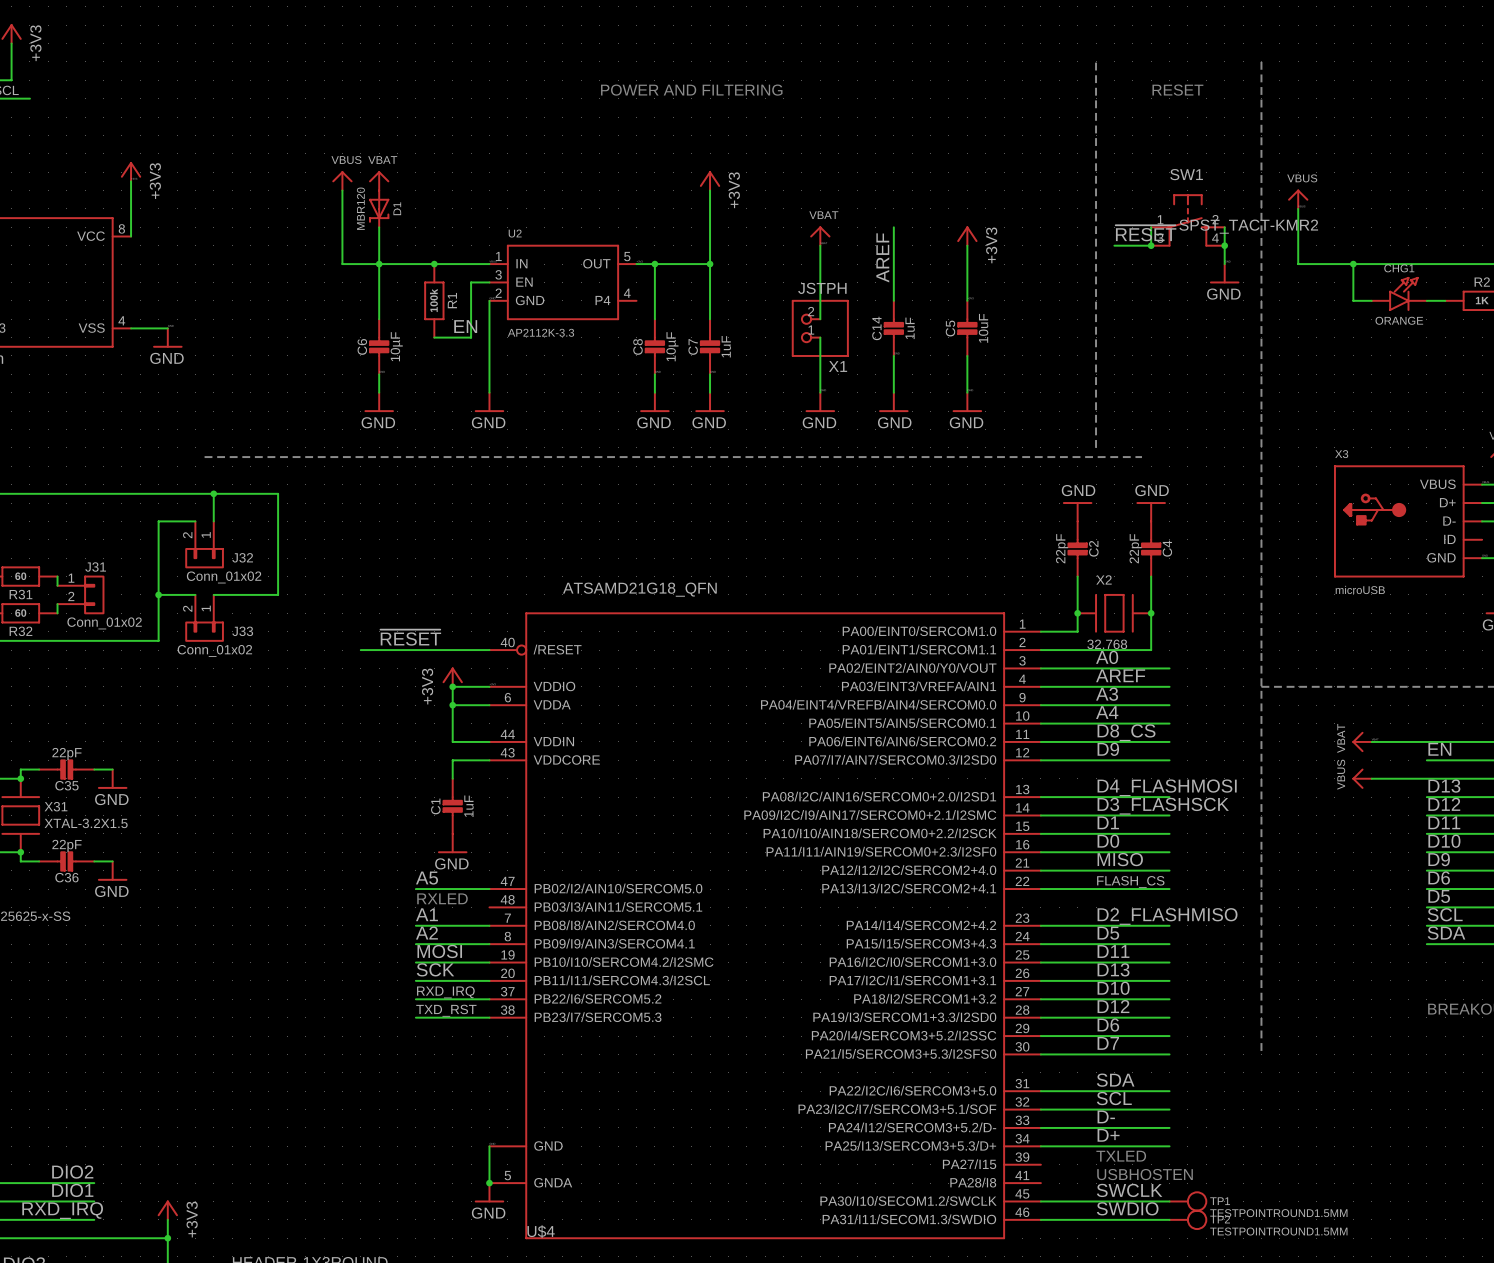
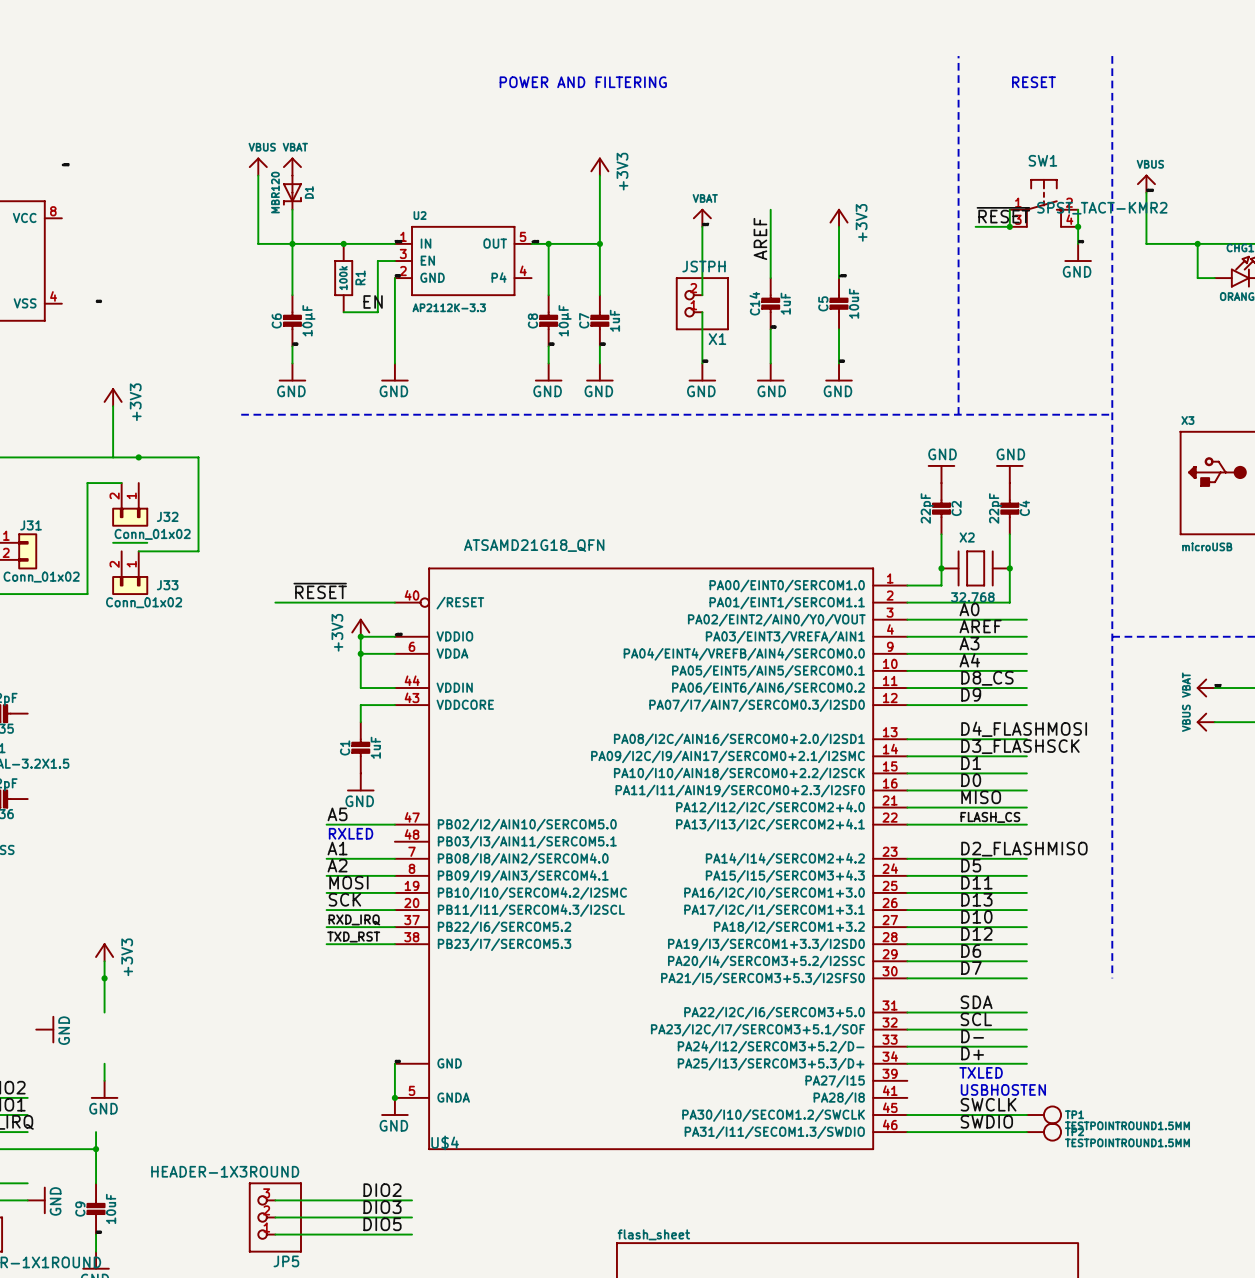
power symbol: +3V3 (131, 172) -> none
wire: (131, 181) (131, 236) -> none
wire: (131, 328) (167, 328) -> none
power symbol: GND (167, 337) -> none
power symbol: none -> +3V3 (113, 397)
wire: none -> (113, 406) (113, 457)
line: (204, 457) (1141, 457) -> (241, 414) (1112, 414)
wire: (213, 493) (213, 521) -> none
wire: (158, 594) (195, 594) -> (113, 542) (147, 542)
junction: (158, 594) -> none
wire: (94, 769) (112, 769) -> none
power symbol: GND (112, 778) -> none
wire: (94, 861) (112, 861) -> none
power symbol: GND (112, 870) -> none
power symbol: none -> +3V3 (104, 952)
wire: none -> (104, 961) (104, 1012)
junction: none -> (104, 978)
power symbol: none -> GND (44, 1029)
wire: none -> (104, 1063) (104, 1080)
power symbol: none -> GND (104, 1089)
power symbol: +3V3 (167, 1210) -> none

